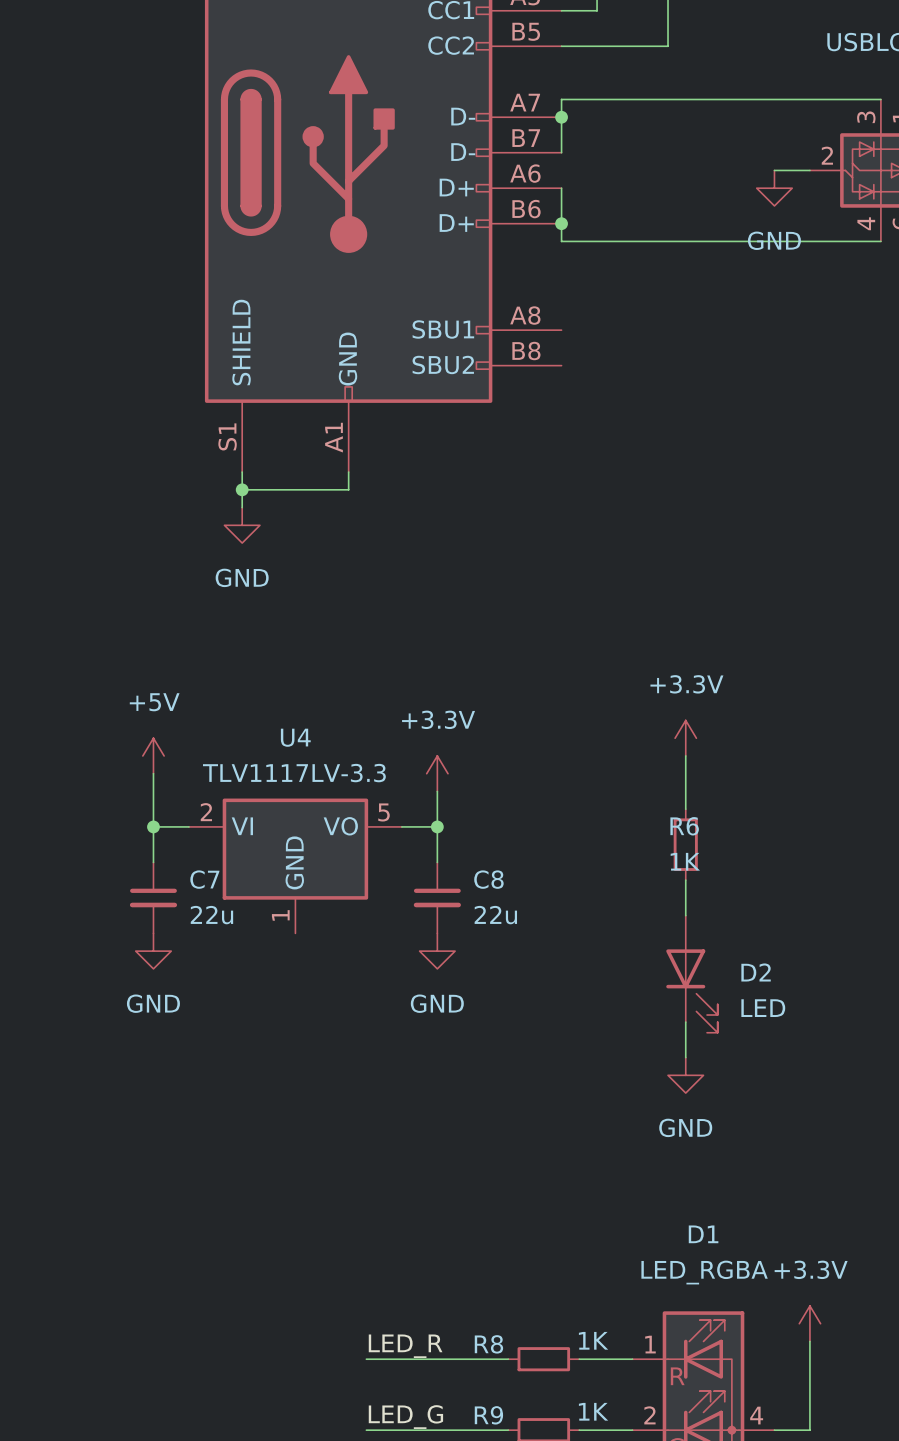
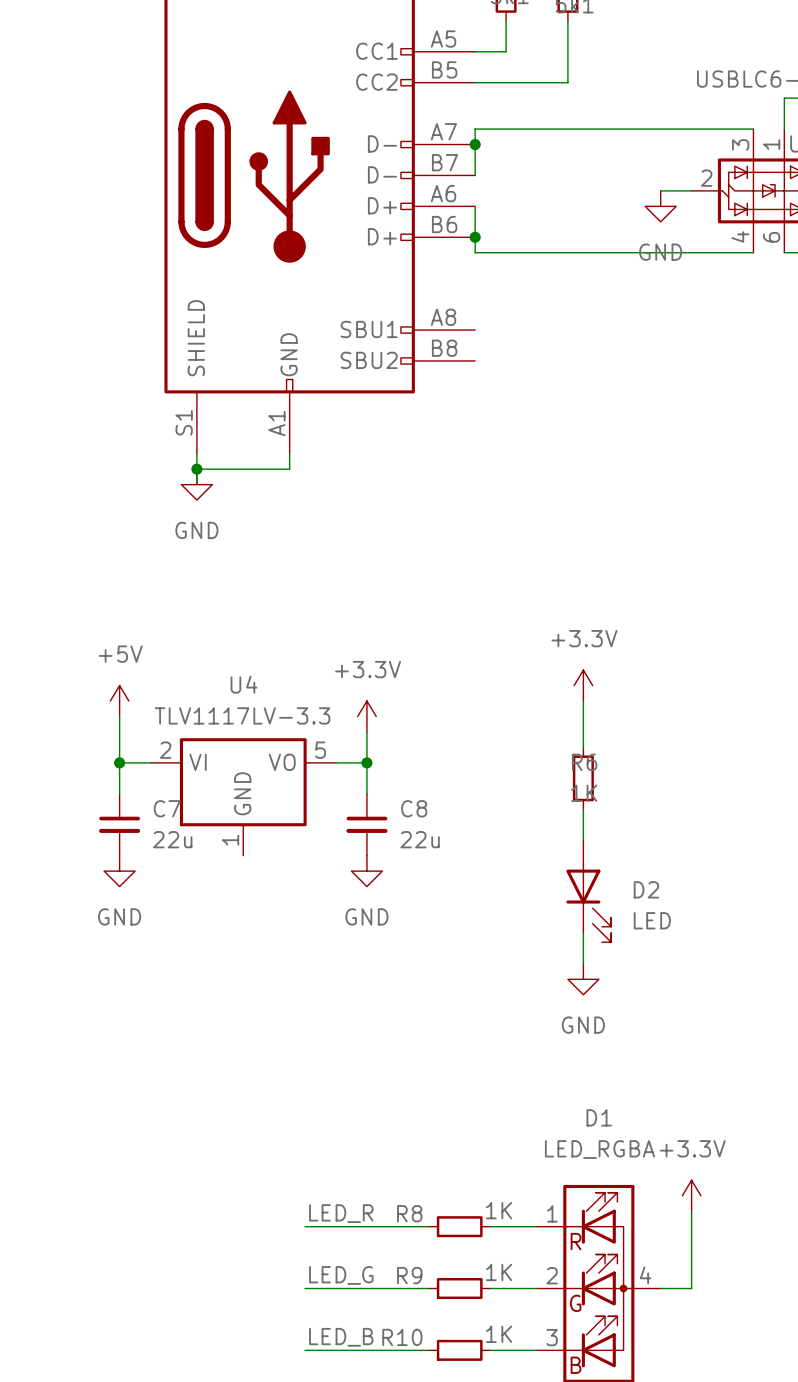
power symbol position: GND (242, 525) -> GND (196, 484)

